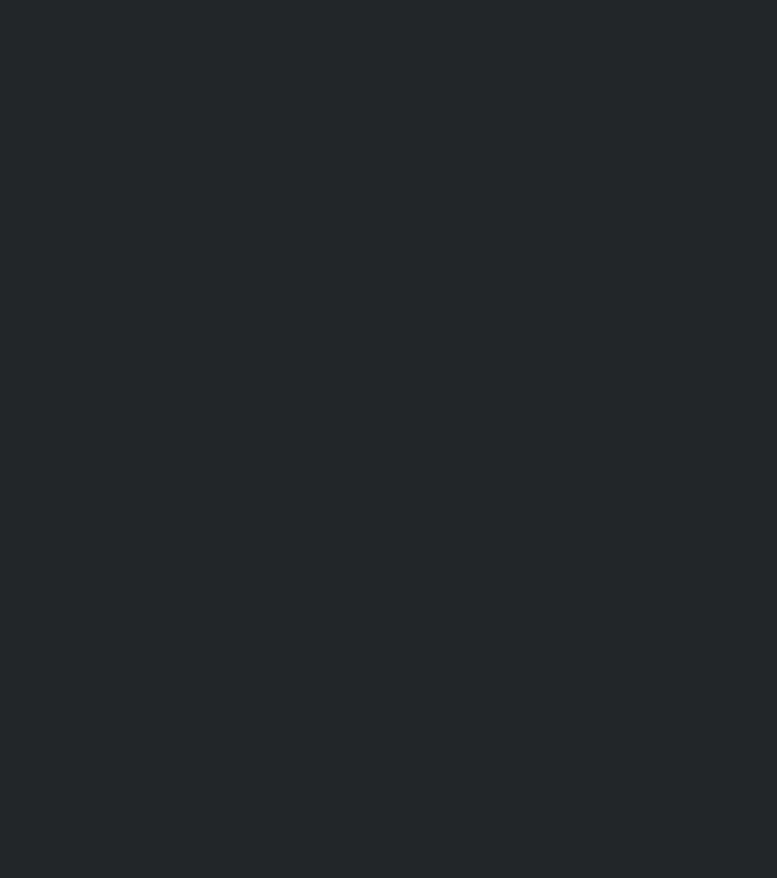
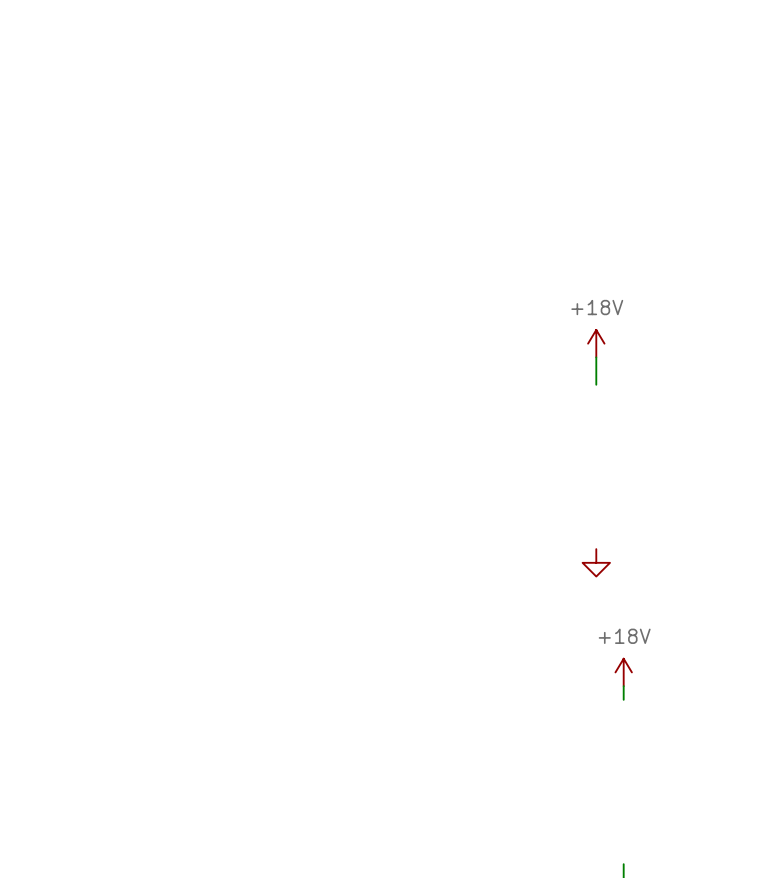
power symbol: none -> +18V (596, 343)
wire: none -> (596, 357) (596, 384)
power symbol: none -> (596, 562)
power symbol: none -> +18V (623, 672)
wire: none -> (623, 686) (623, 699)
wire: none -> (623, 864) (623, 877)

